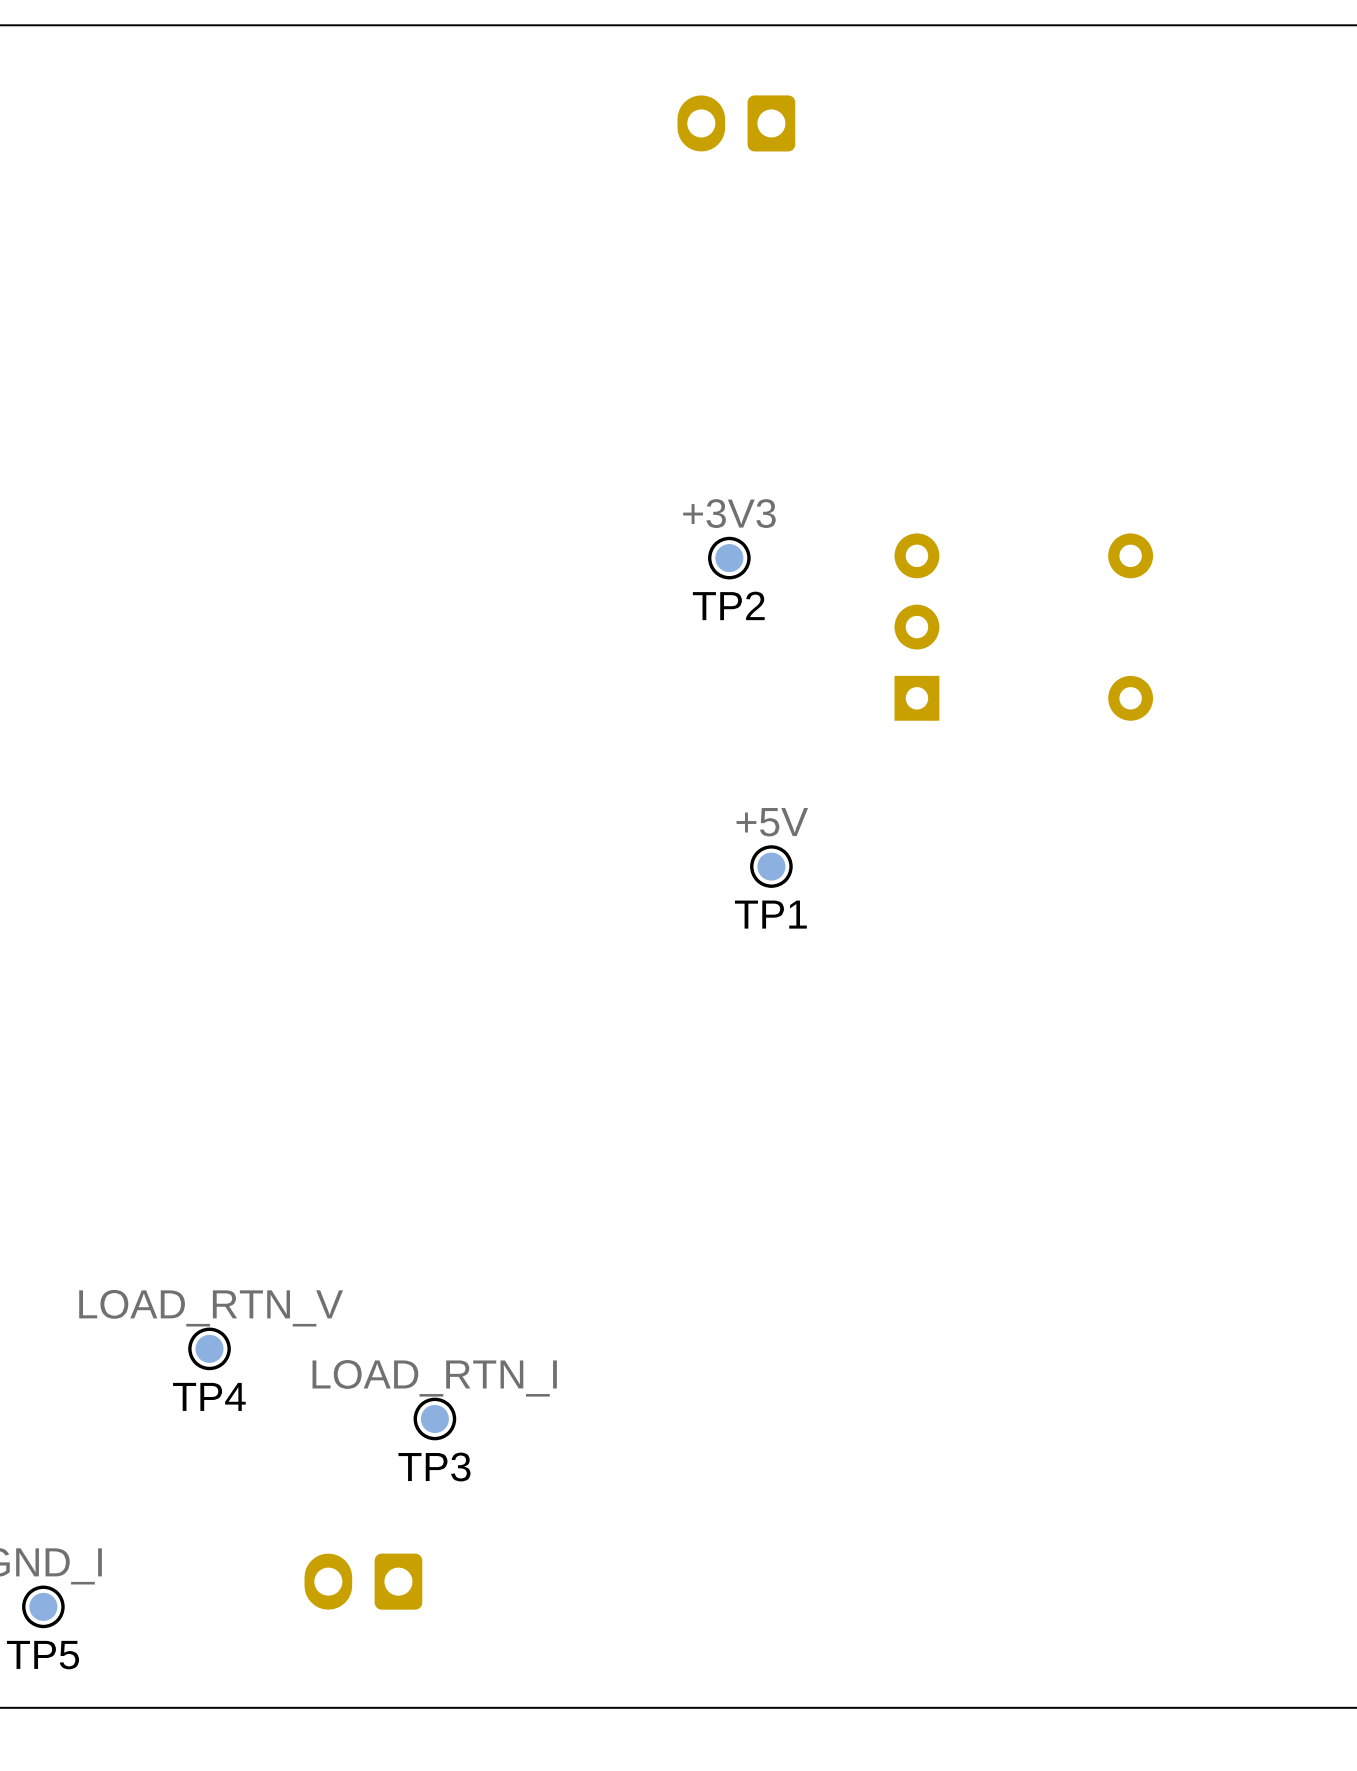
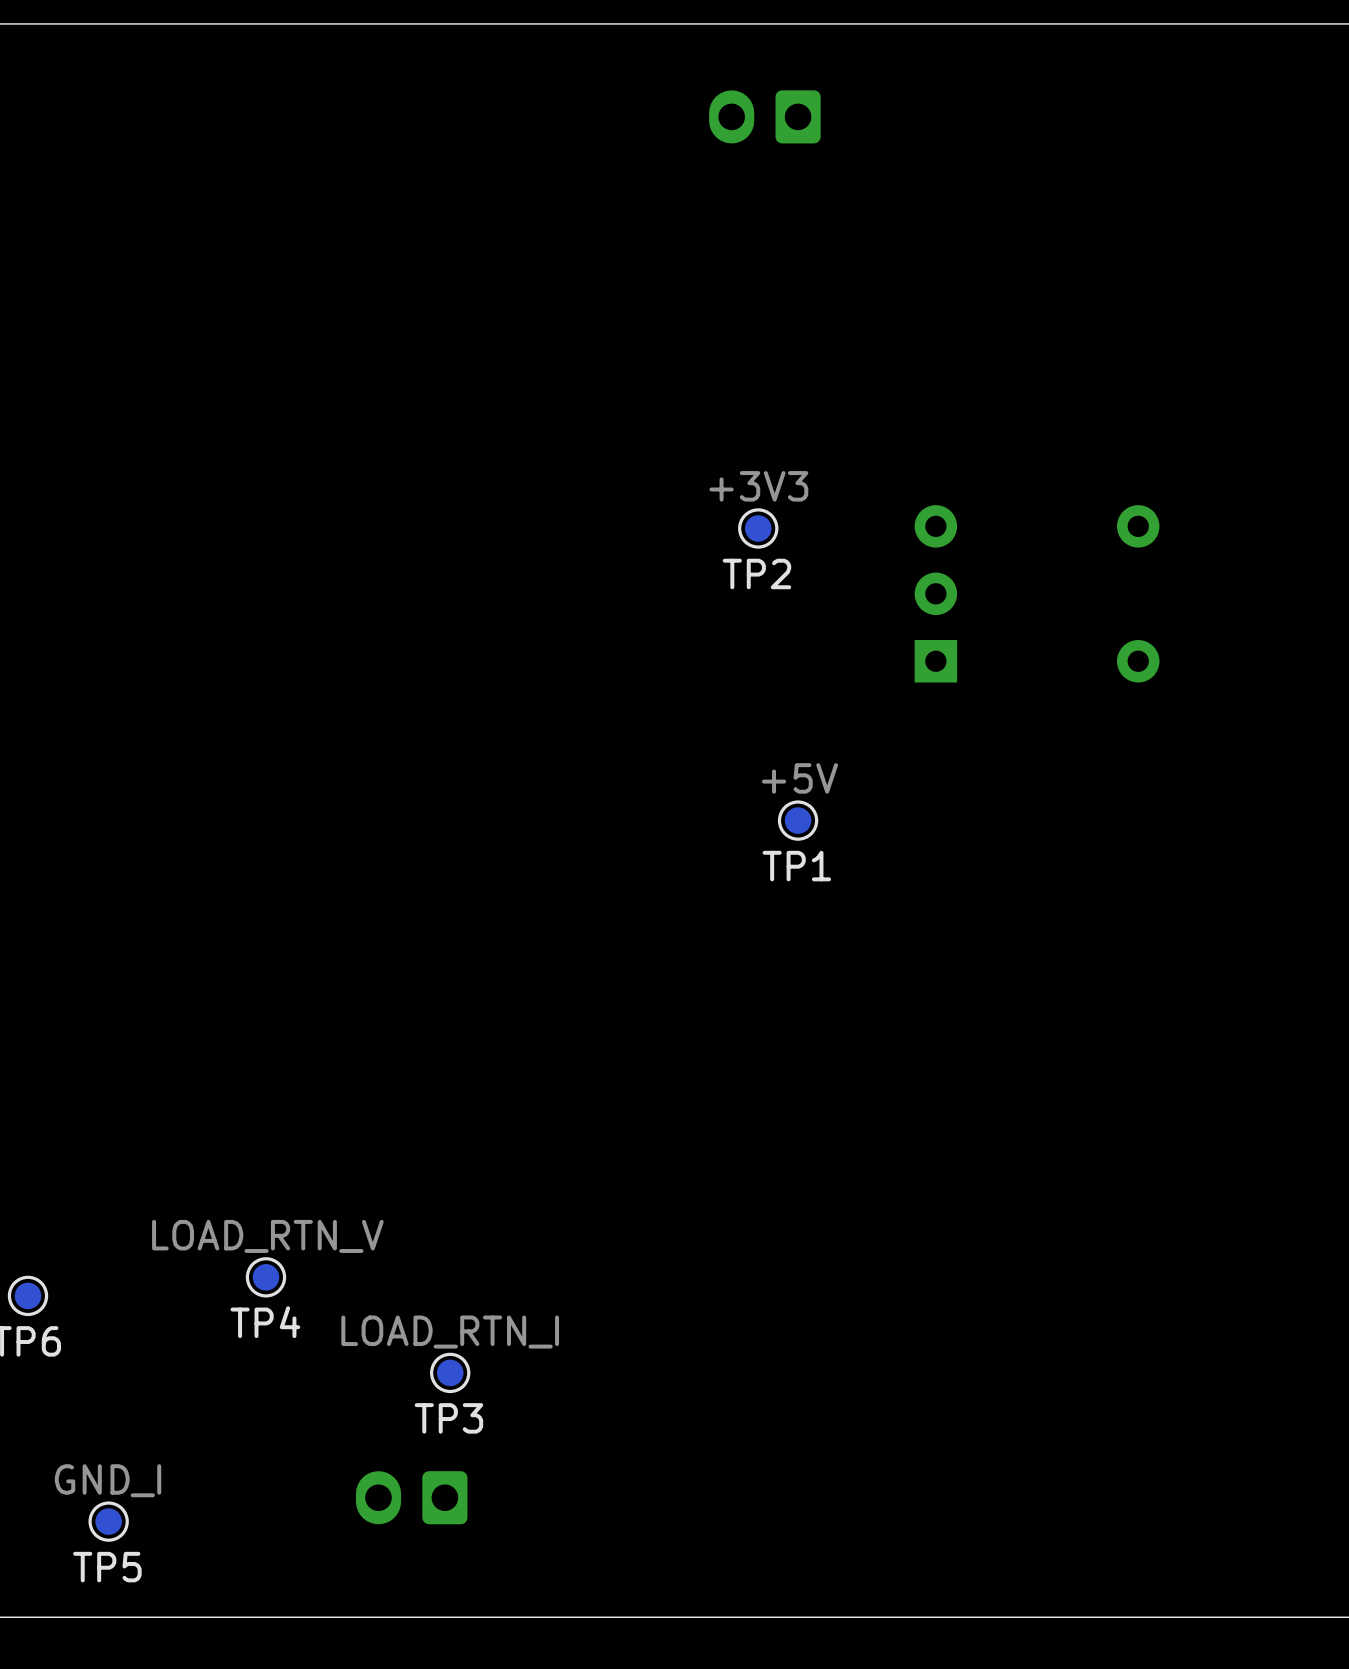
TP3 position: (434, 1418) -> (450, 1372)

